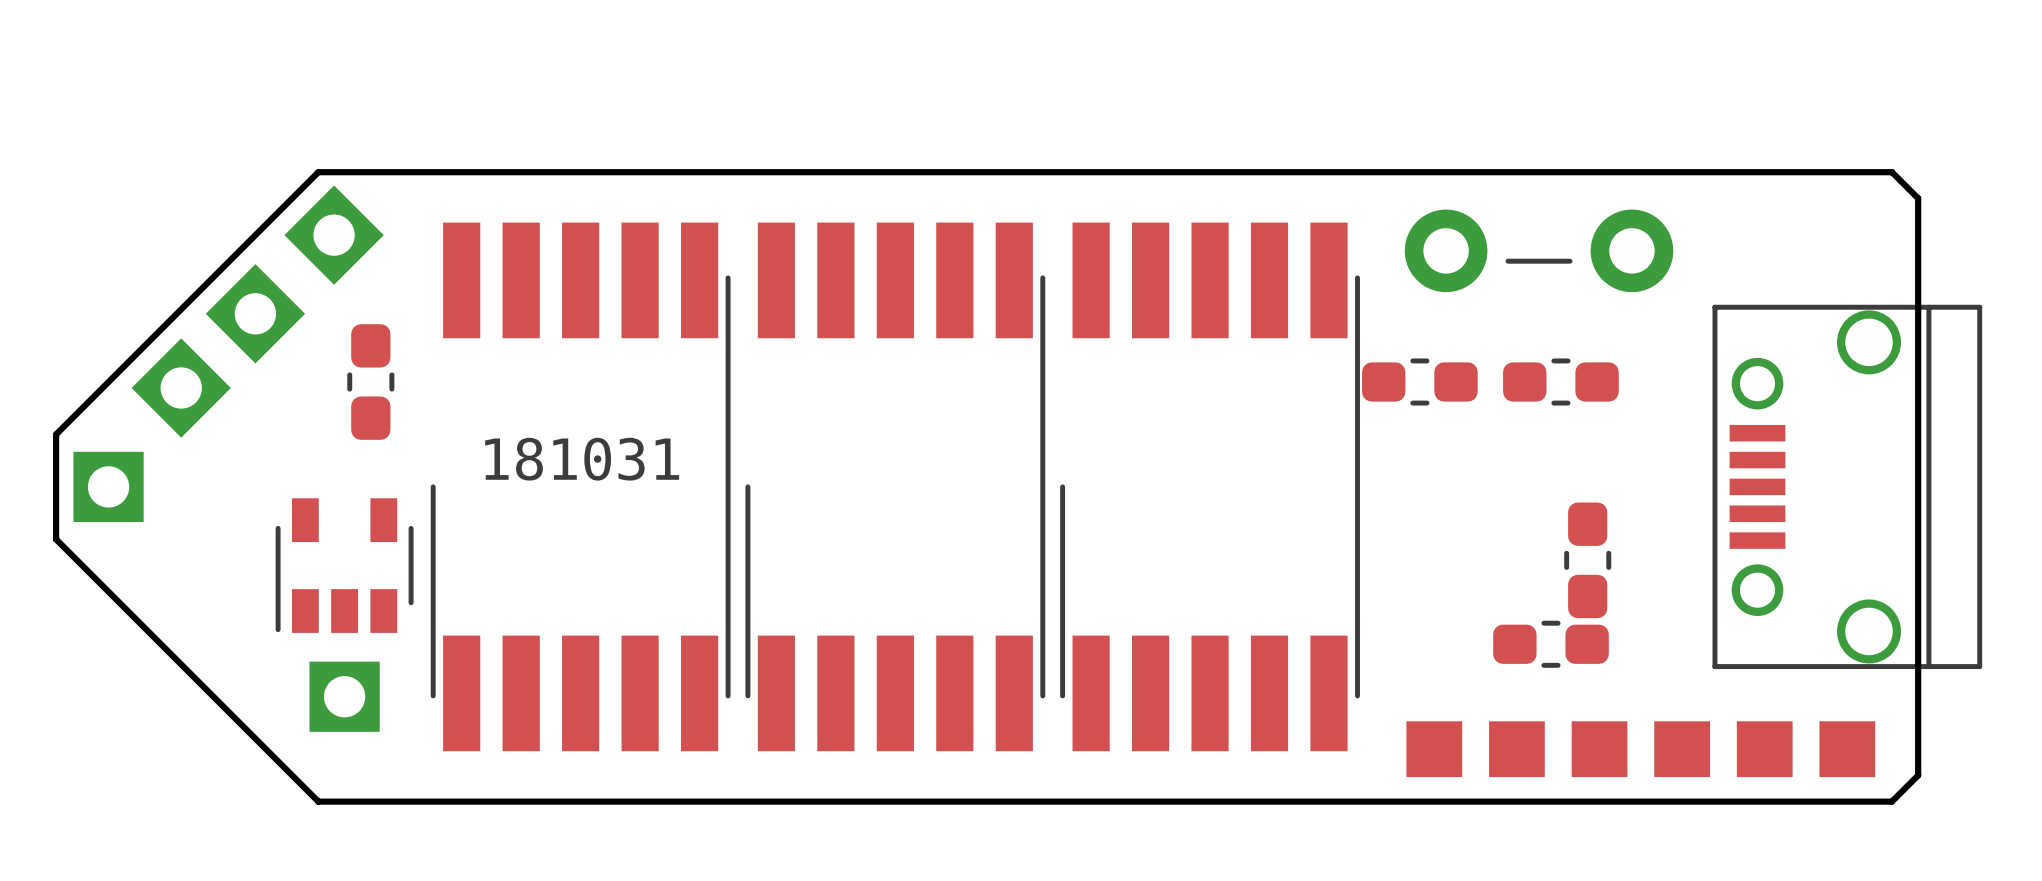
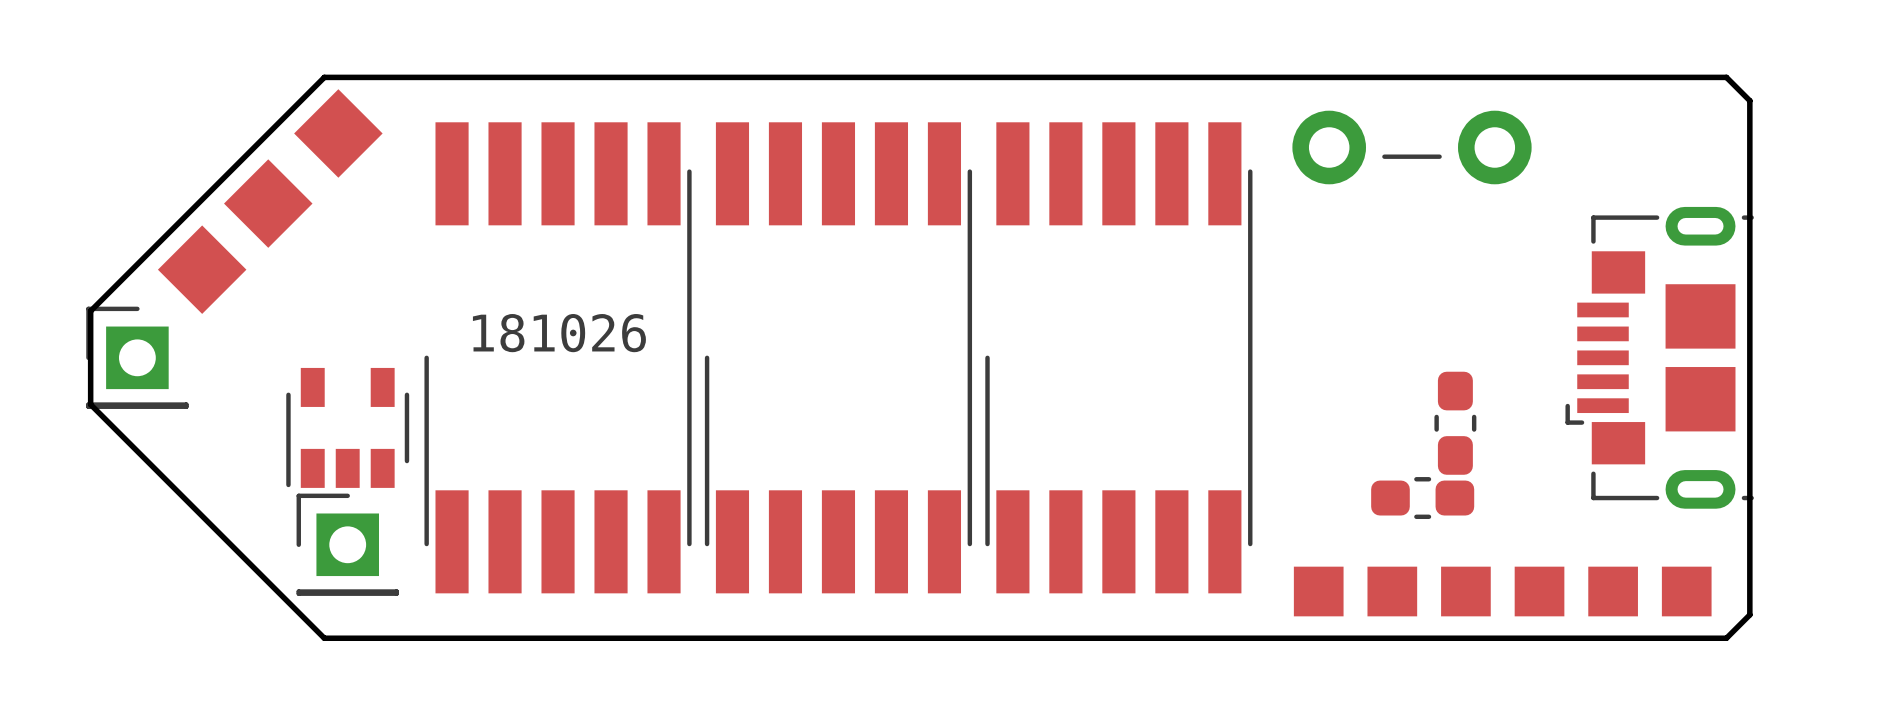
part footprint: [284, 185, 384, 285] -> [294, 89, 383, 178]
part footprint: [131, 264, 306, 438] -> [157, 159, 313, 314]
part footprint: [1712, 304, 1983, 670] -> [1565, 206, 1754, 509]
part: (370, 382) -> none
part: (1419, 382) -> none
part: (1560, 382) -> none
part footprint: [73, 451, 144, 523] -> [86, 306, 189, 409]
text: 181031 (582, 459) -> 181026 (559, 333)
part footprint: [309, 661, 380, 732] -> [296, 493, 399, 596]

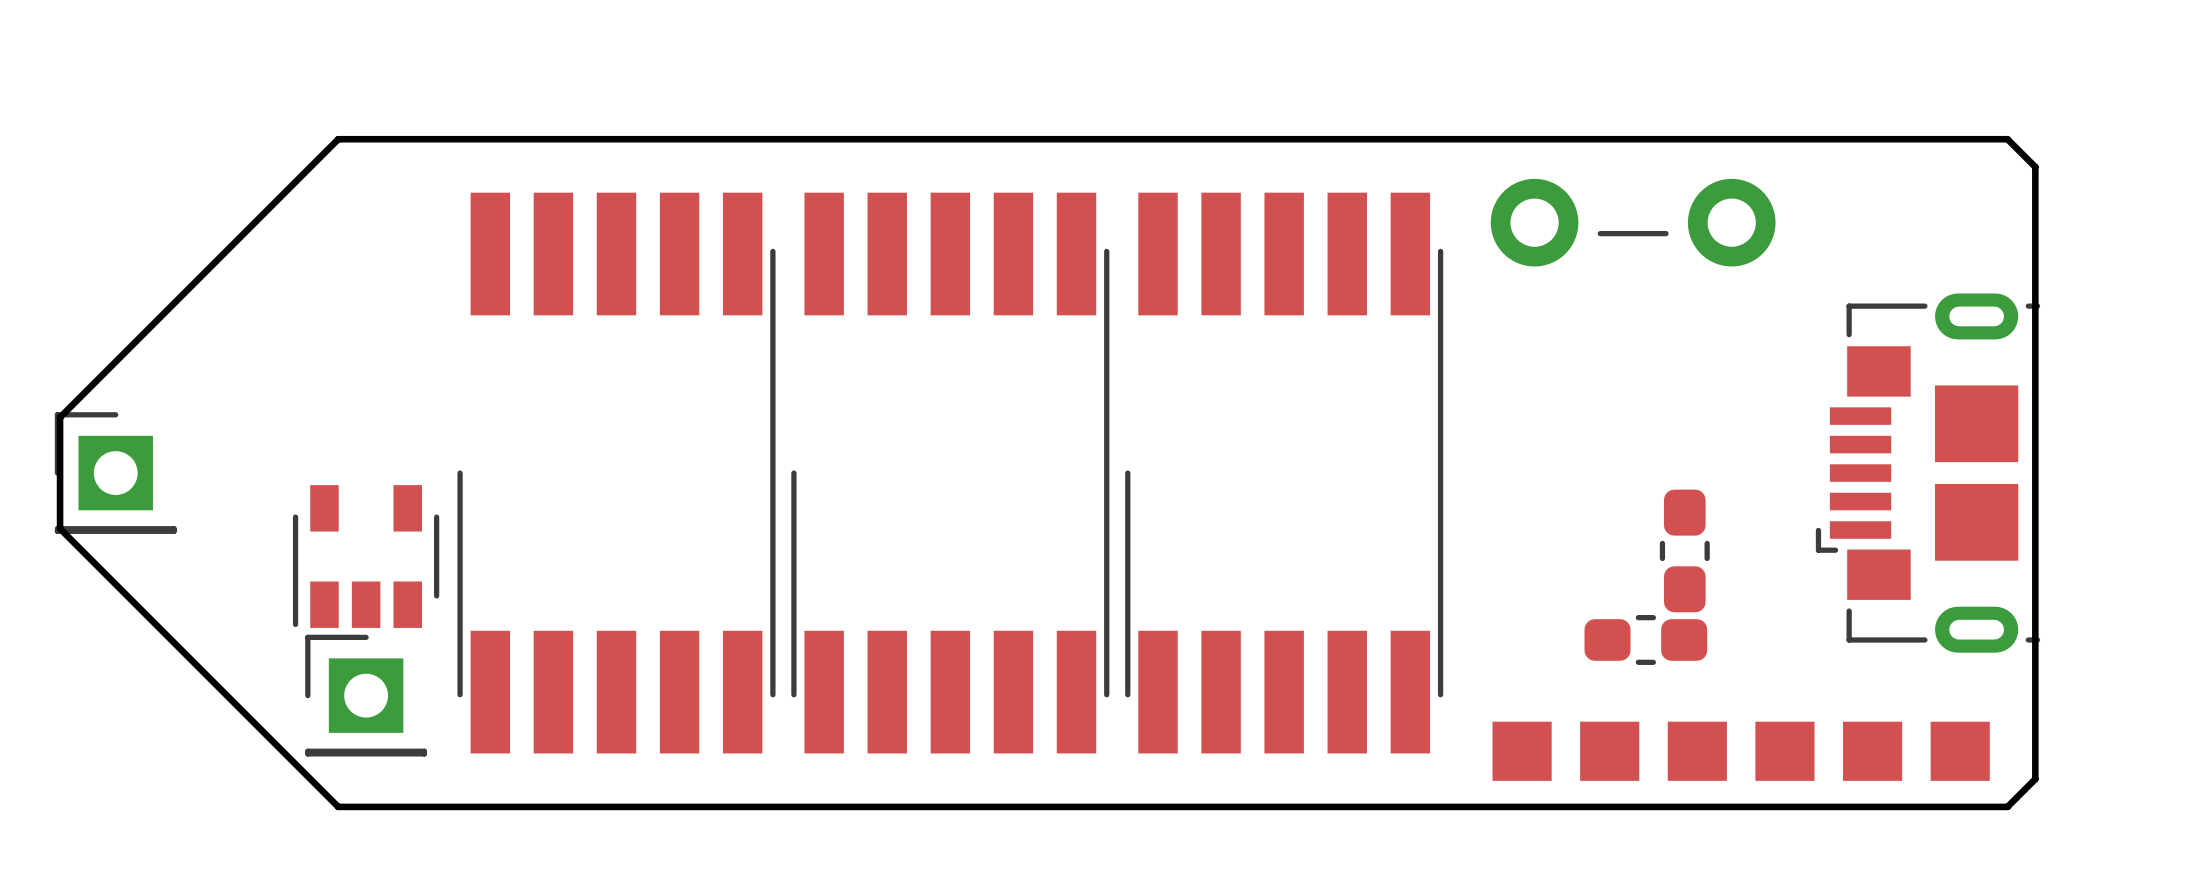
part: (338, 133) -> none
part: (235, 236) -> none
text: 181026 (559, 333) -> none

